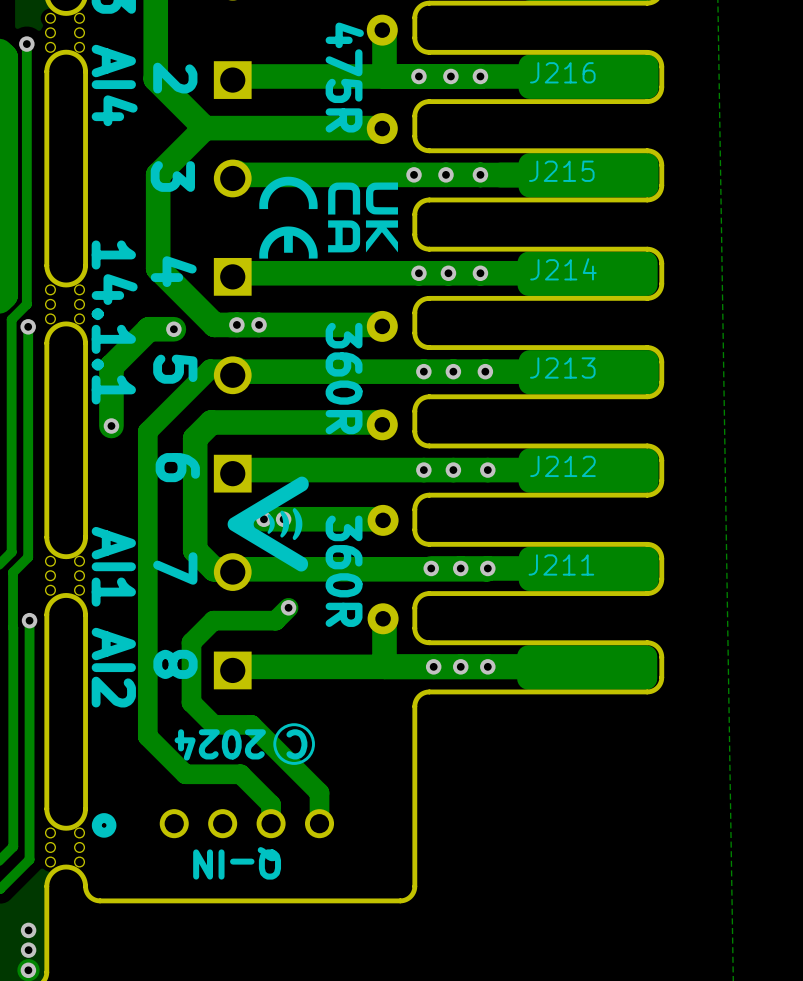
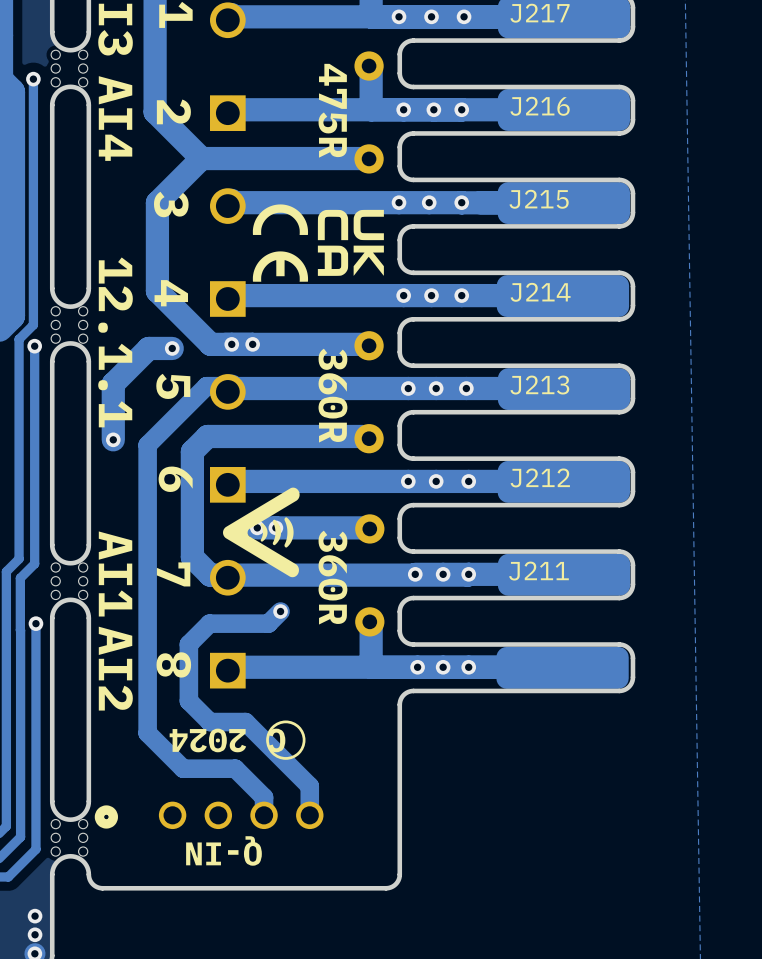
text: 14.1.1 (114, 322) -> 12.1.1 (115, 342)

